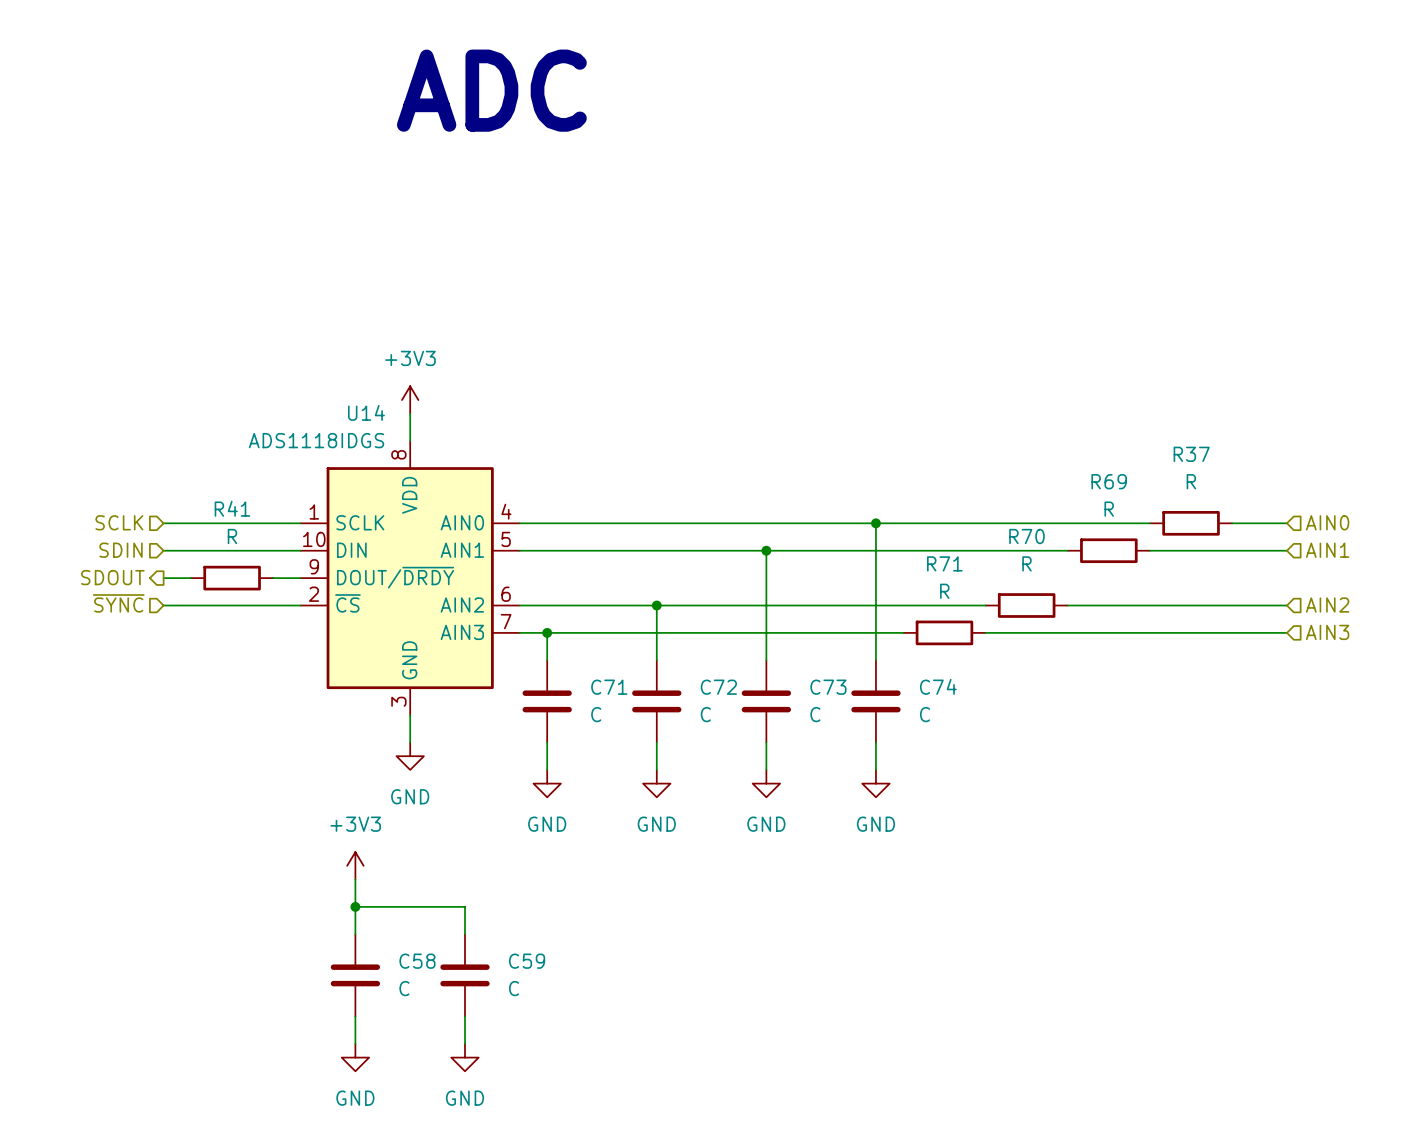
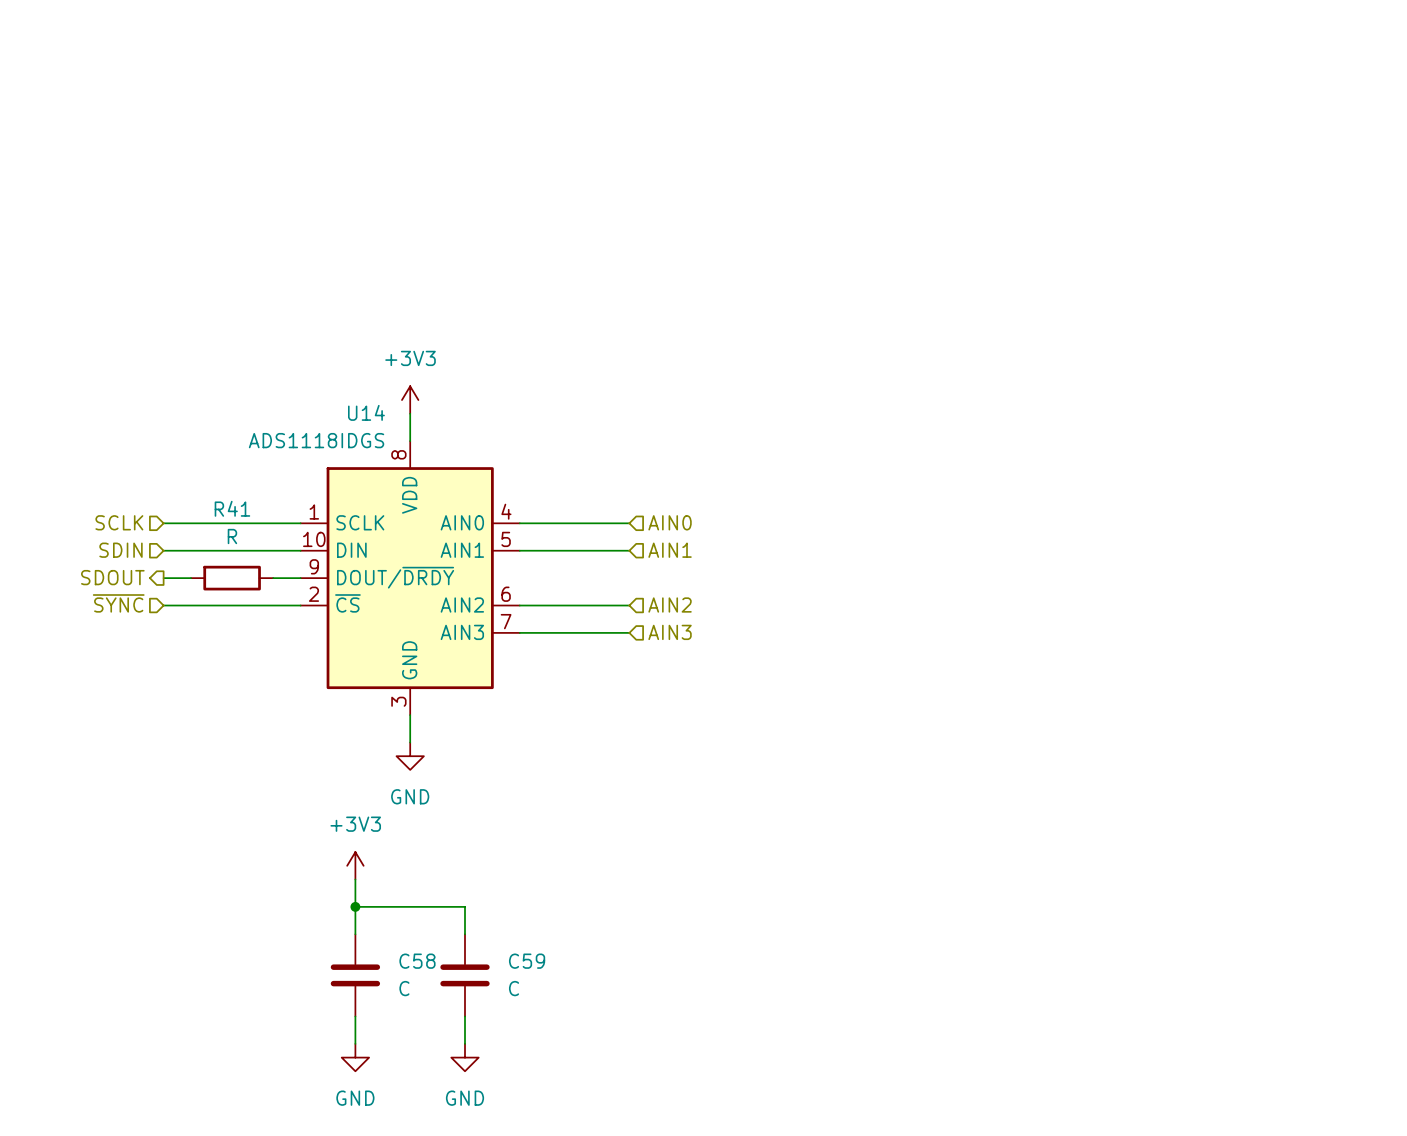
text: ADC (491, 90) -> none
hierarchical label: none -> AIN0 (670, 522)
hierarchical label: AIN0 (1327, 522) -> none
wire: (629, 523) (1149, 523) -> none
wire: (875, 523) (875, 660) -> none
junction: (875, 523) -> none
R37: R (1191, 523) -> none
wire: (1232, 523) (1286, 523) -> none
wire: (629, 550) (1067, 550) -> none
hierarchical label: none -> AIN1 (670, 550)
wire: (766, 550) (766, 660) -> none
junction: (766, 550) -> none
R69: R (1108, 550) -> none
wire: (1149, 550) (1286, 550) -> none
hierarchical label: AIN1 (1327, 550) -> none
wire: (629, 605) (985, 605) -> none
wire: (656, 605) (656, 660) -> none
junction: (656, 605) -> none
hierarchical label: none -> AIN2 (670, 605)
R70: R (1026, 605) -> none
wire: (1067, 605) (1286, 605) -> none
hierarchical label: AIN2 (1327, 605) -> none
wire: (547, 632) (547, 660) -> none
junction: (547, 632) -> none
wire: (629, 632) (903, 632) -> none
hierarchical label: none -> AIN3 (670, 632)
R71: R (944, 632) -> none
wire: (985, 632) (1286, 632) -> none
hierarchical label: AIN3 (1327, 632) -> none
C71: C (547, 701) -> none
C72: C (656, 701) -> none
C73: C (766, 701) -> none
C74: C (875, 701) -> none
wire: (547, 742) (547, 769) -> none
wire: (656, 742) (656, 769) -> none
wire: (766, 742) (766, 769) -> none
wire: (875, 742) (875, 769) -> none
power symbol: GND (547, 783) -> none
power symbol: GND (656, 783) -> none
power symbol: GND (766, 783) -> none
power symbol: GND (875, 783) -> none

